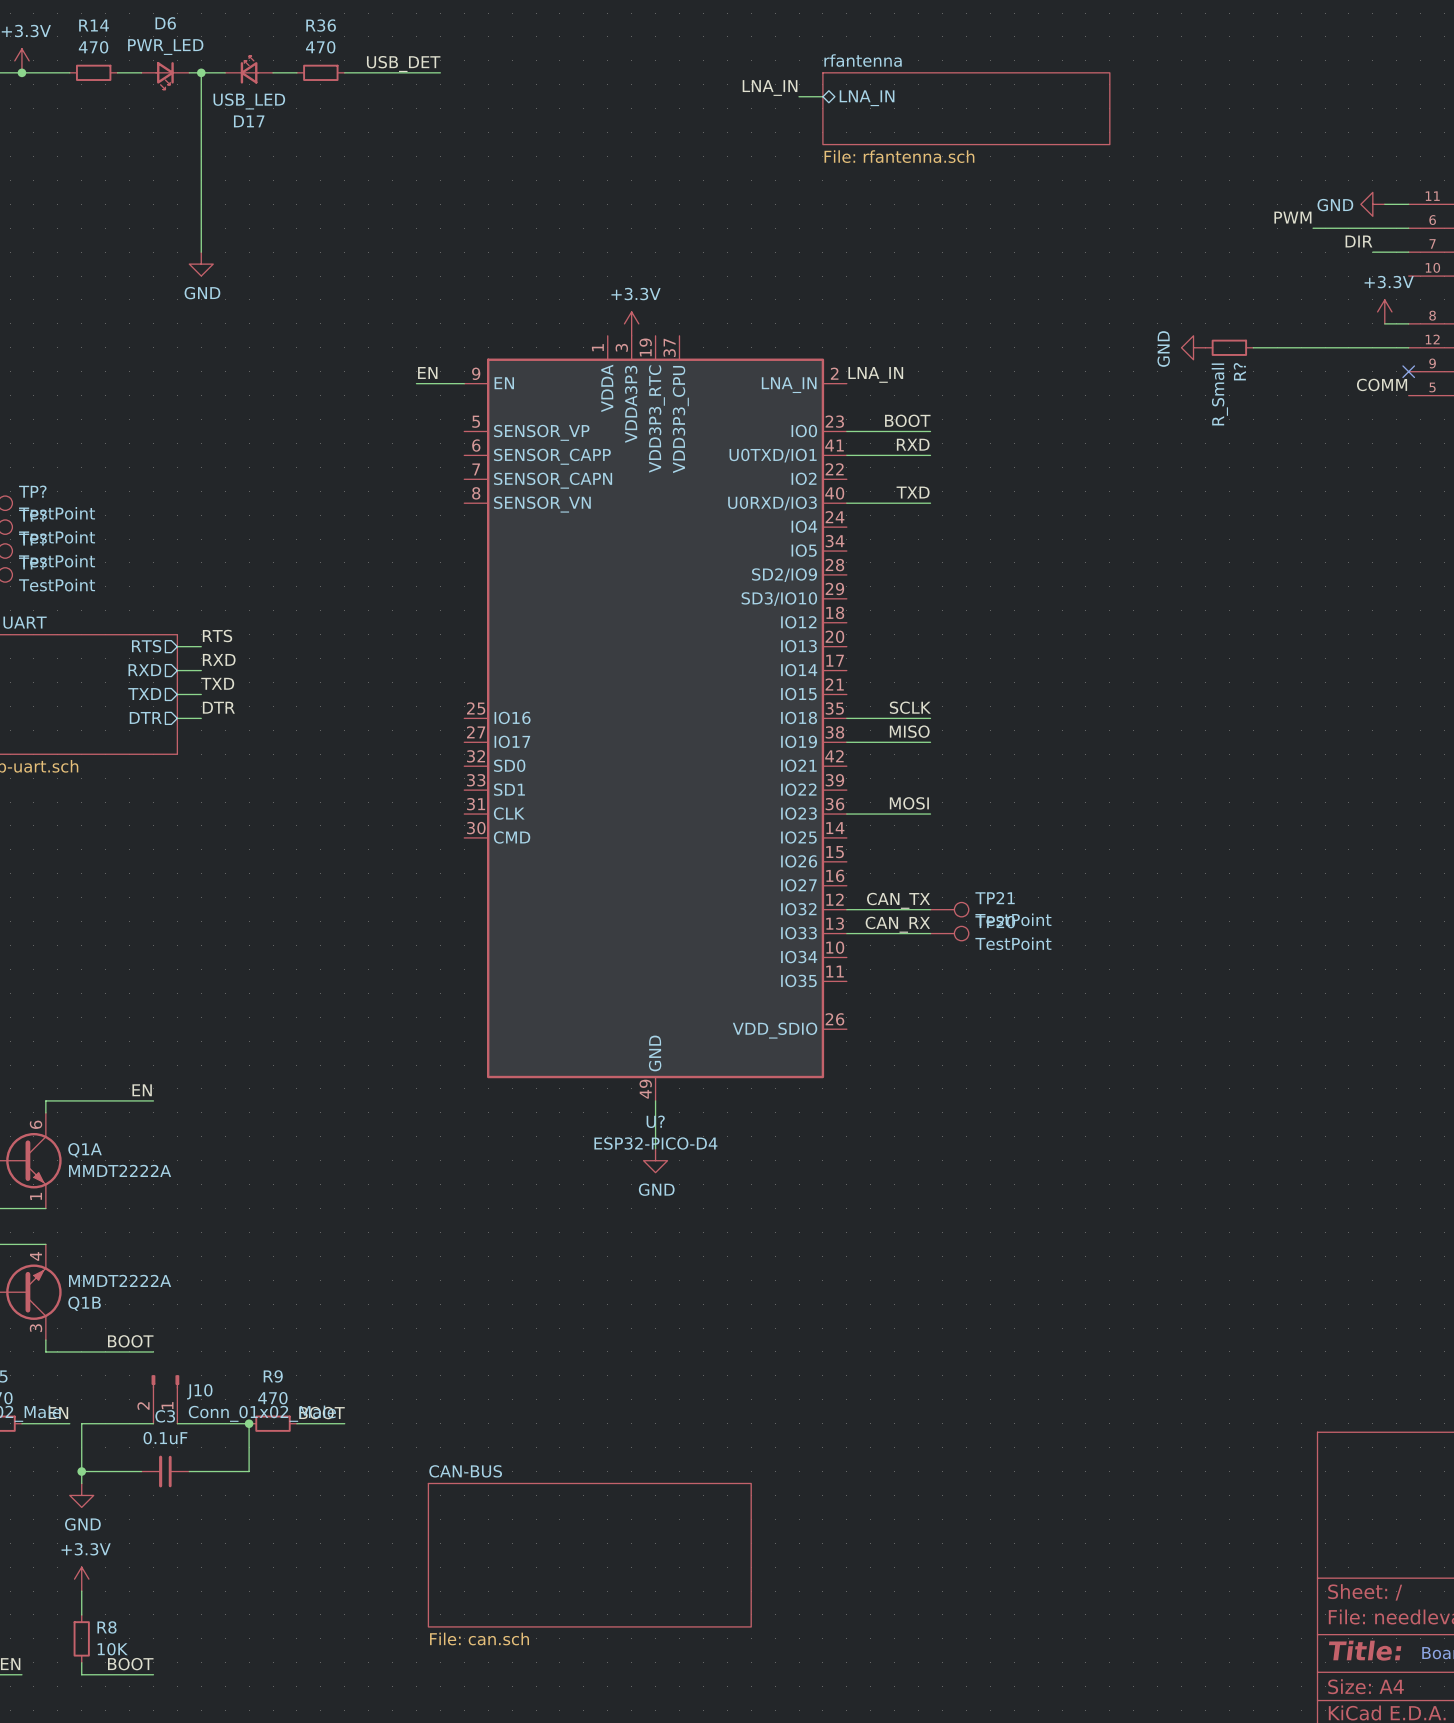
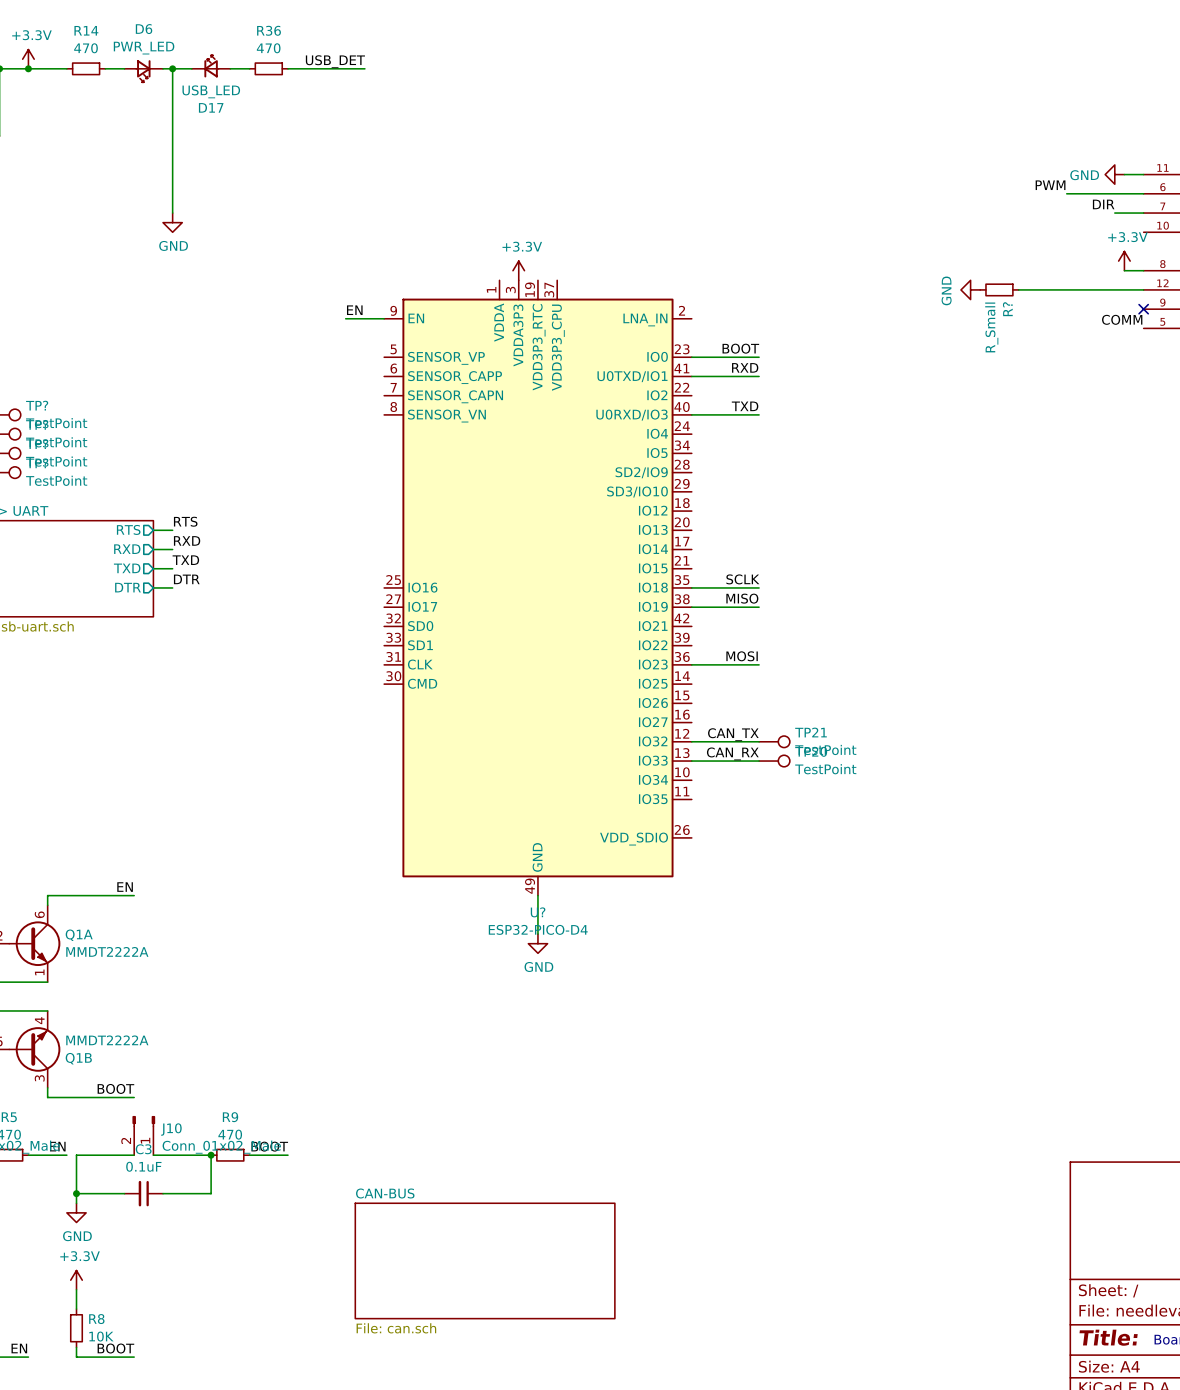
label: LNA_IN (770, 88) -> none
wire: (799, 96) (822, 96) -> none
sheet pin: LNA_IN (867, 98) -> none
sheet rfantenna: File: rfantenna.sch (966, 108) -> none
label: LNA_IN (875, 374) -> none

